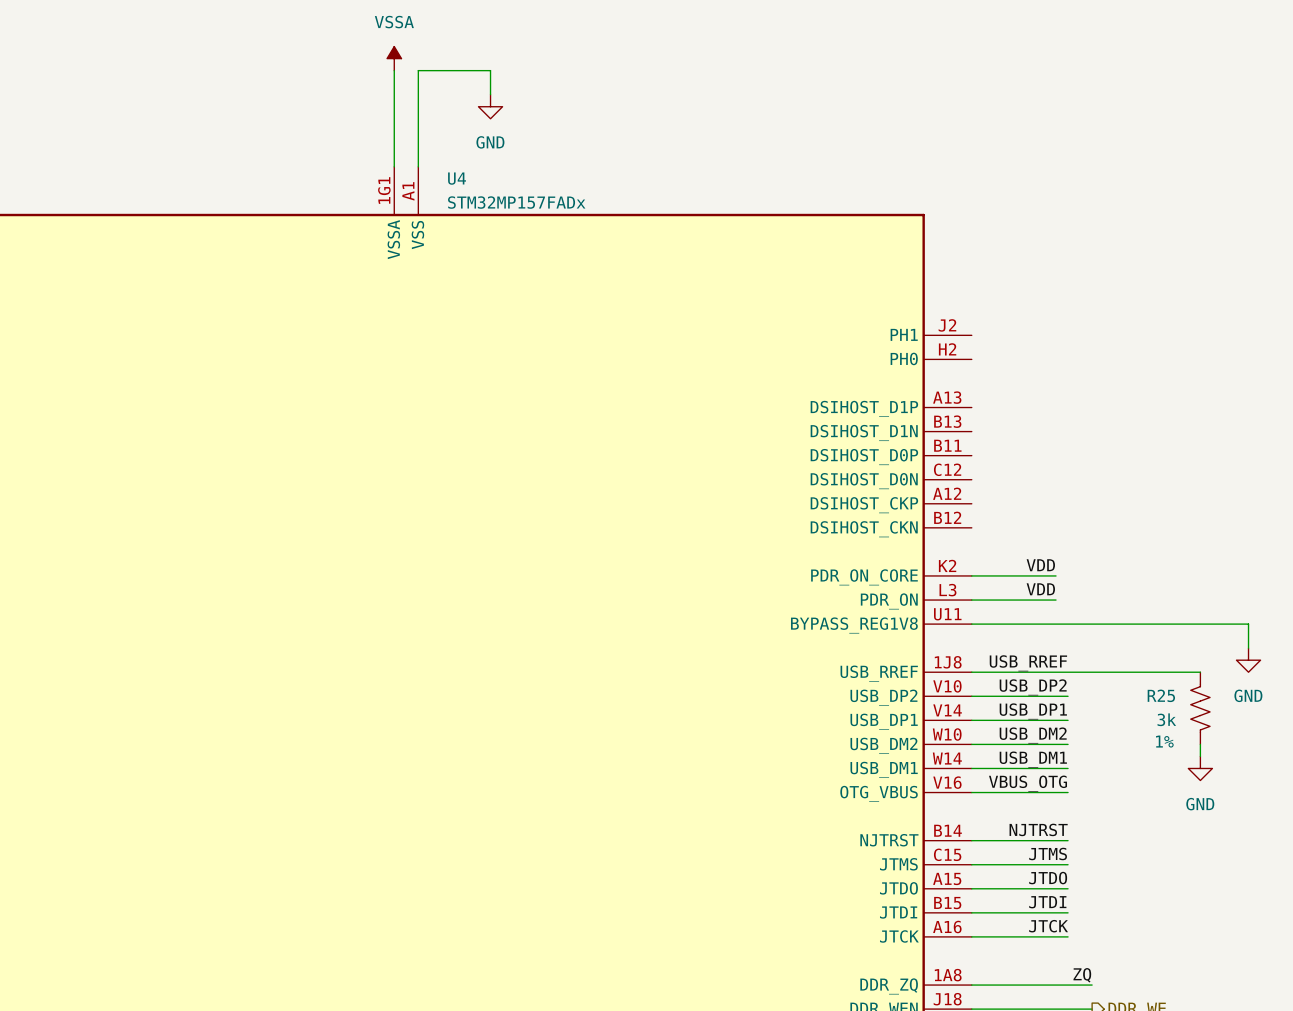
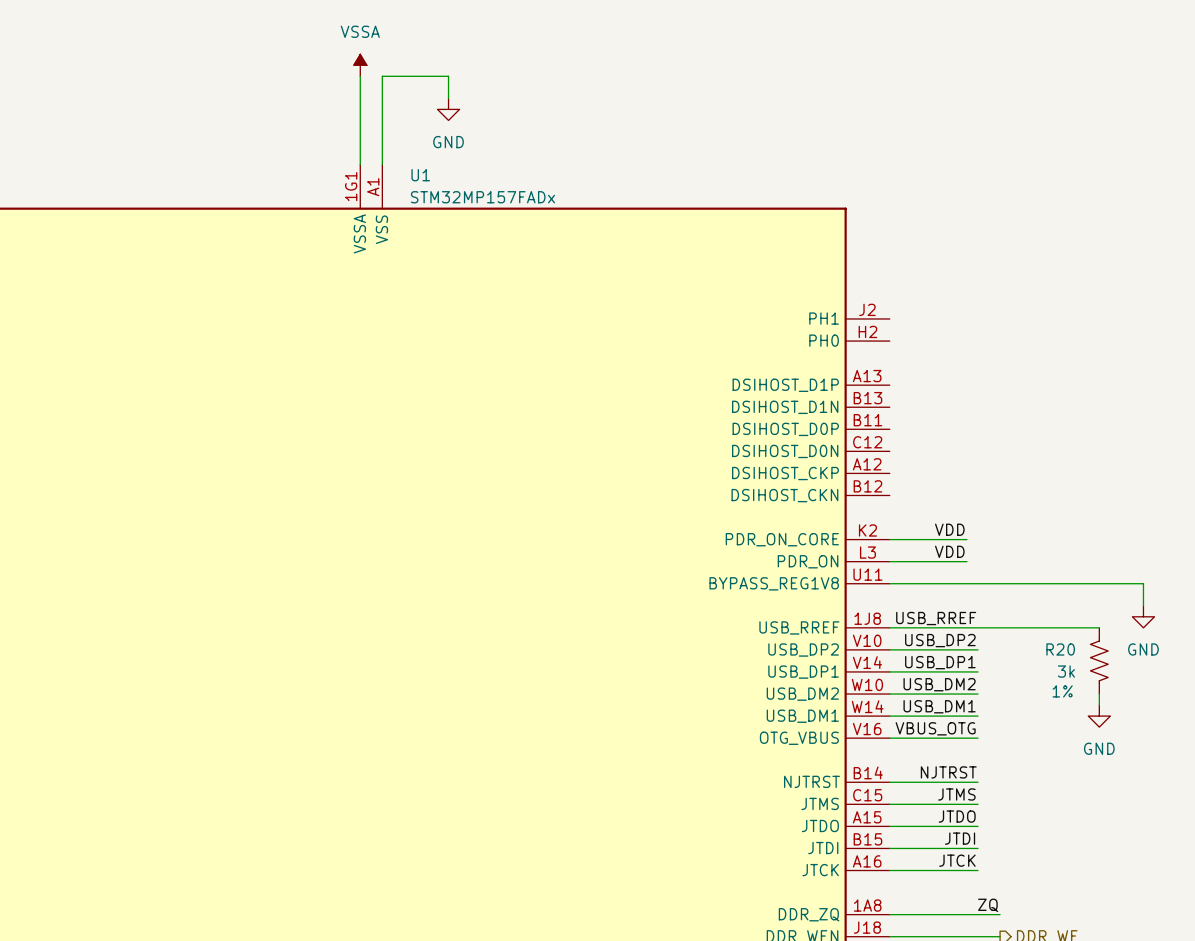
U4 name: U4 (457, 178) -> U1 (420, 175)
R25 name: R25 (1161, 695) -> R20 (1060, 649)

